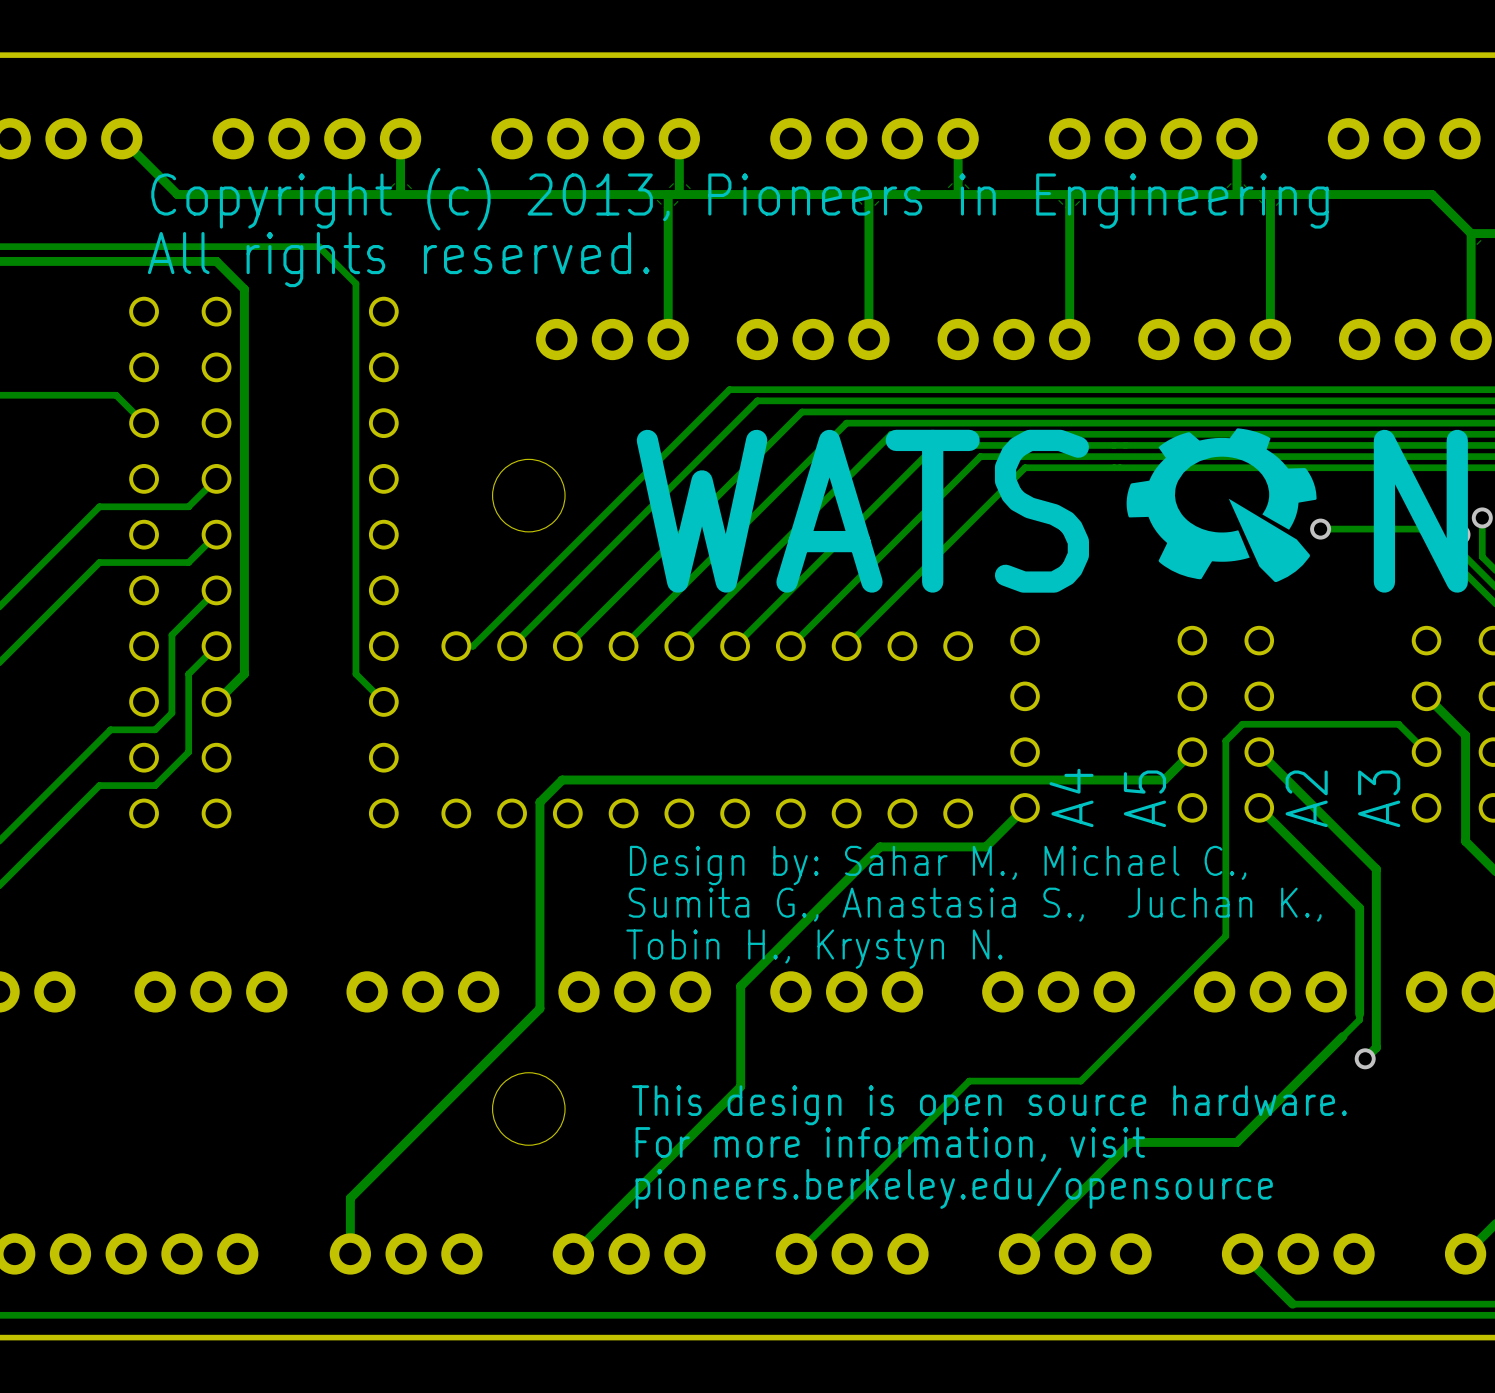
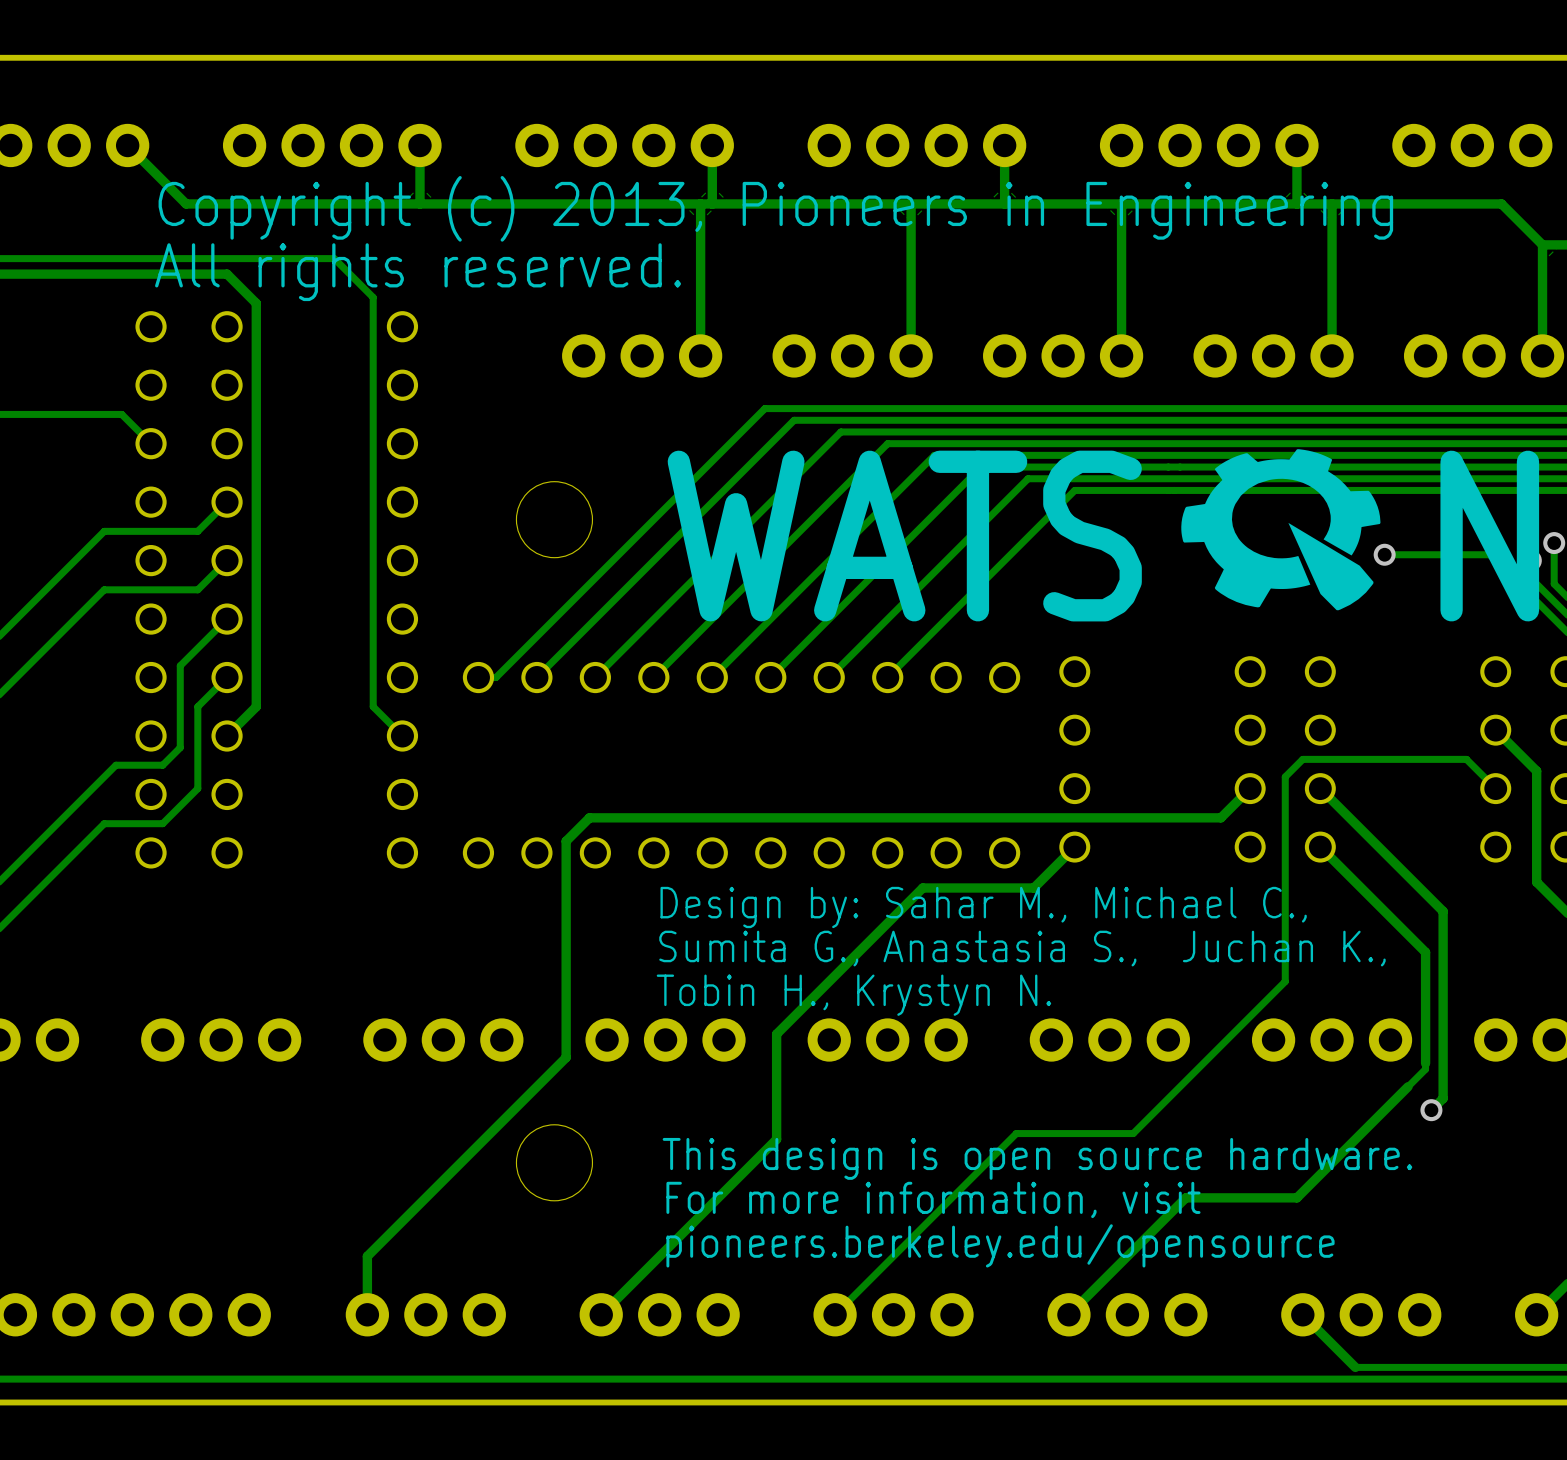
text: A4 (1071, 797) -> none
text: A5 (1144, 798) -> none
text: A2 (1306, 798) -> none
text: A3 (1379, 798) -> none

